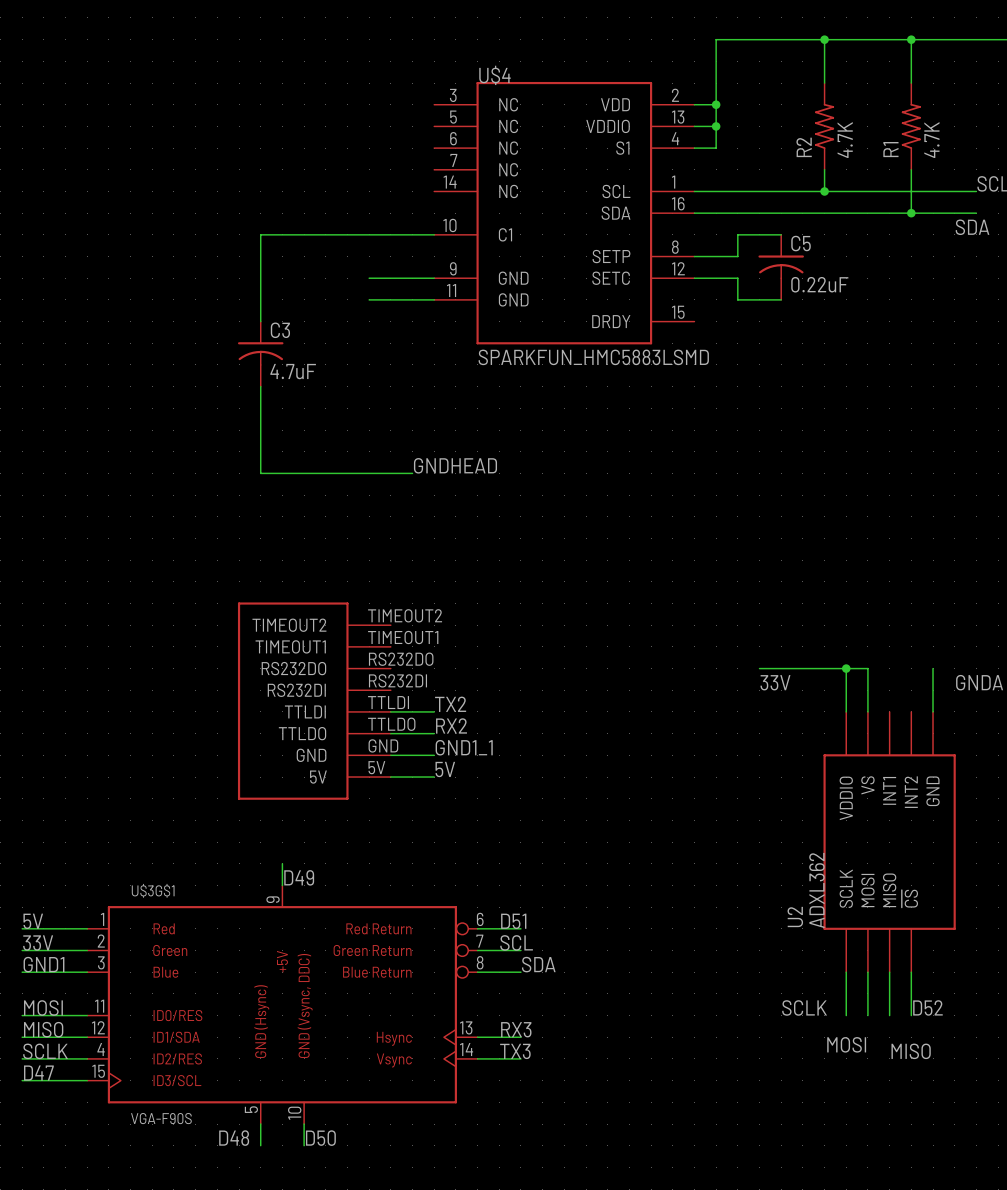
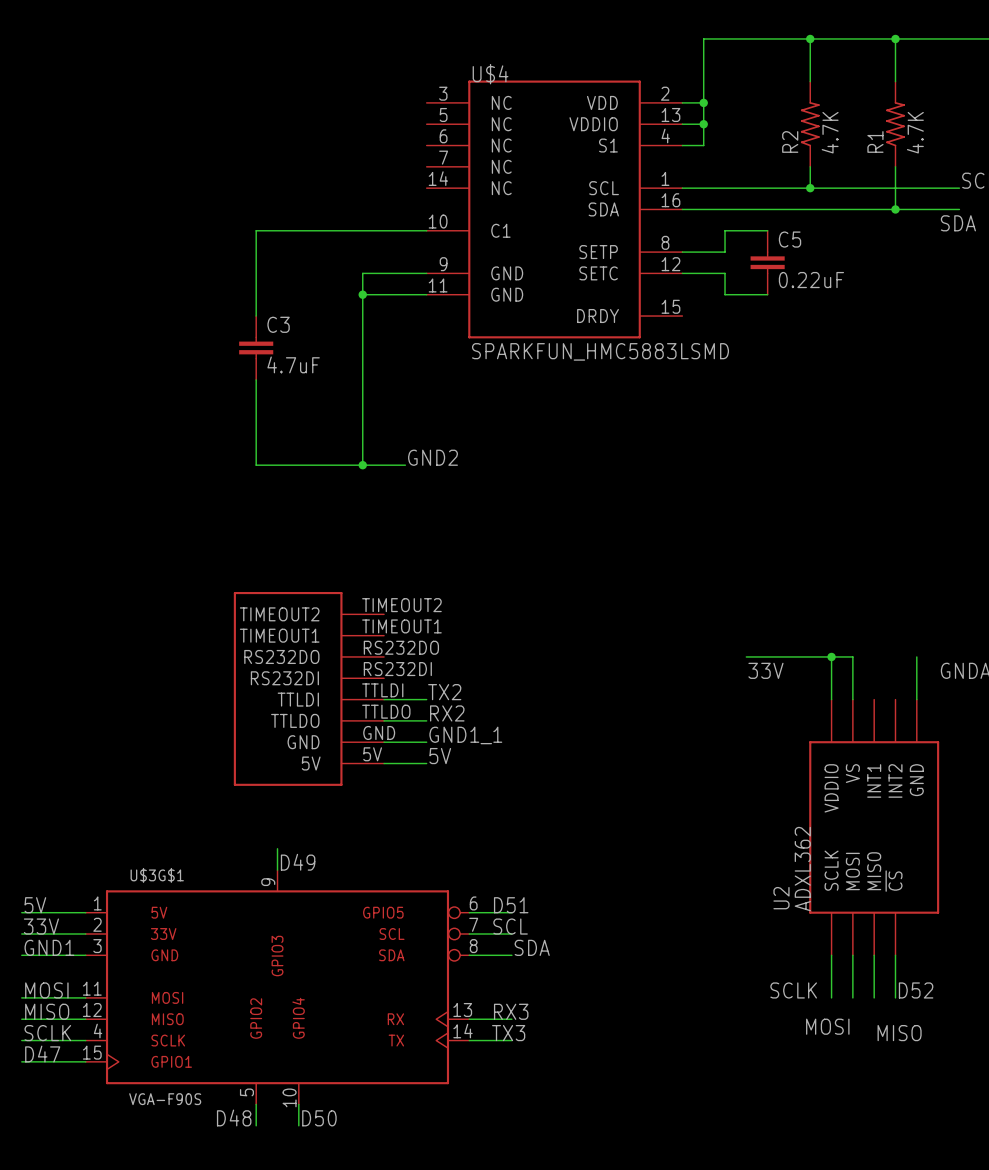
C5 symbol: [758, 234, 804, 300] -> [750, 230, 785, 295]
wire: none -> (362, 273) (362, 465)
junction: none -> (362, 294)
C3 symbol: [237, 321, 284, 387] -> [239, 316, 274, 380]
label: GNDHEAD (455, 465) -> GND2 (433, 457)
junction: none -> (362, 465)
U$3G$1 symbol: [87, 885, 478, 1125] -> [85, 870, 470, 1105]

